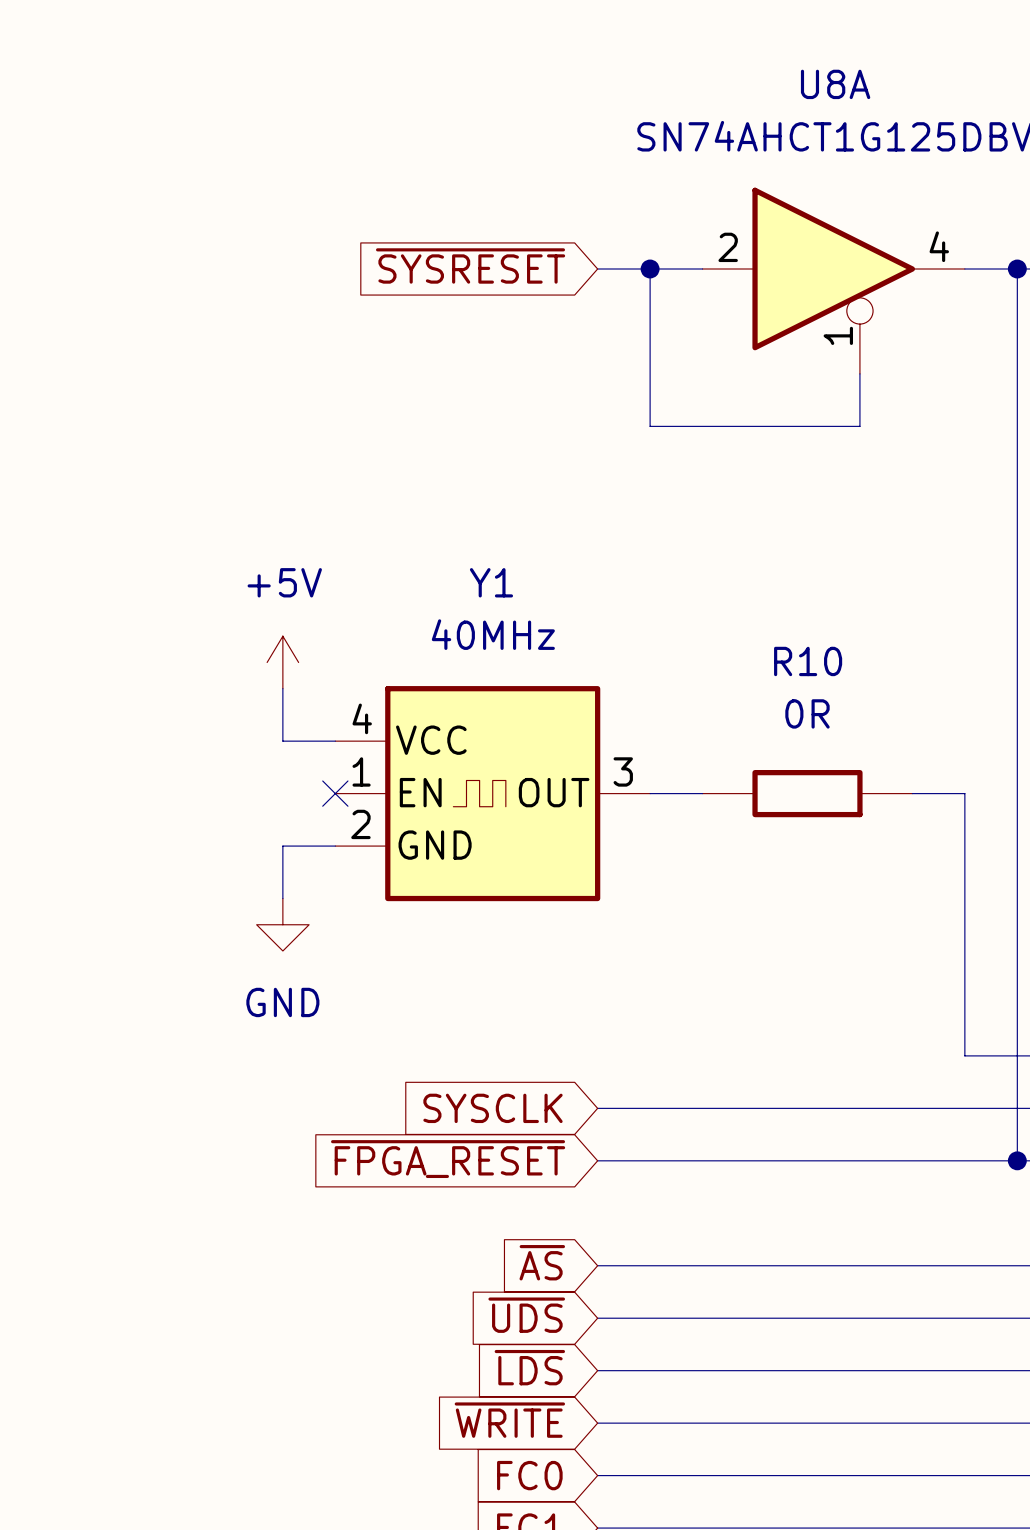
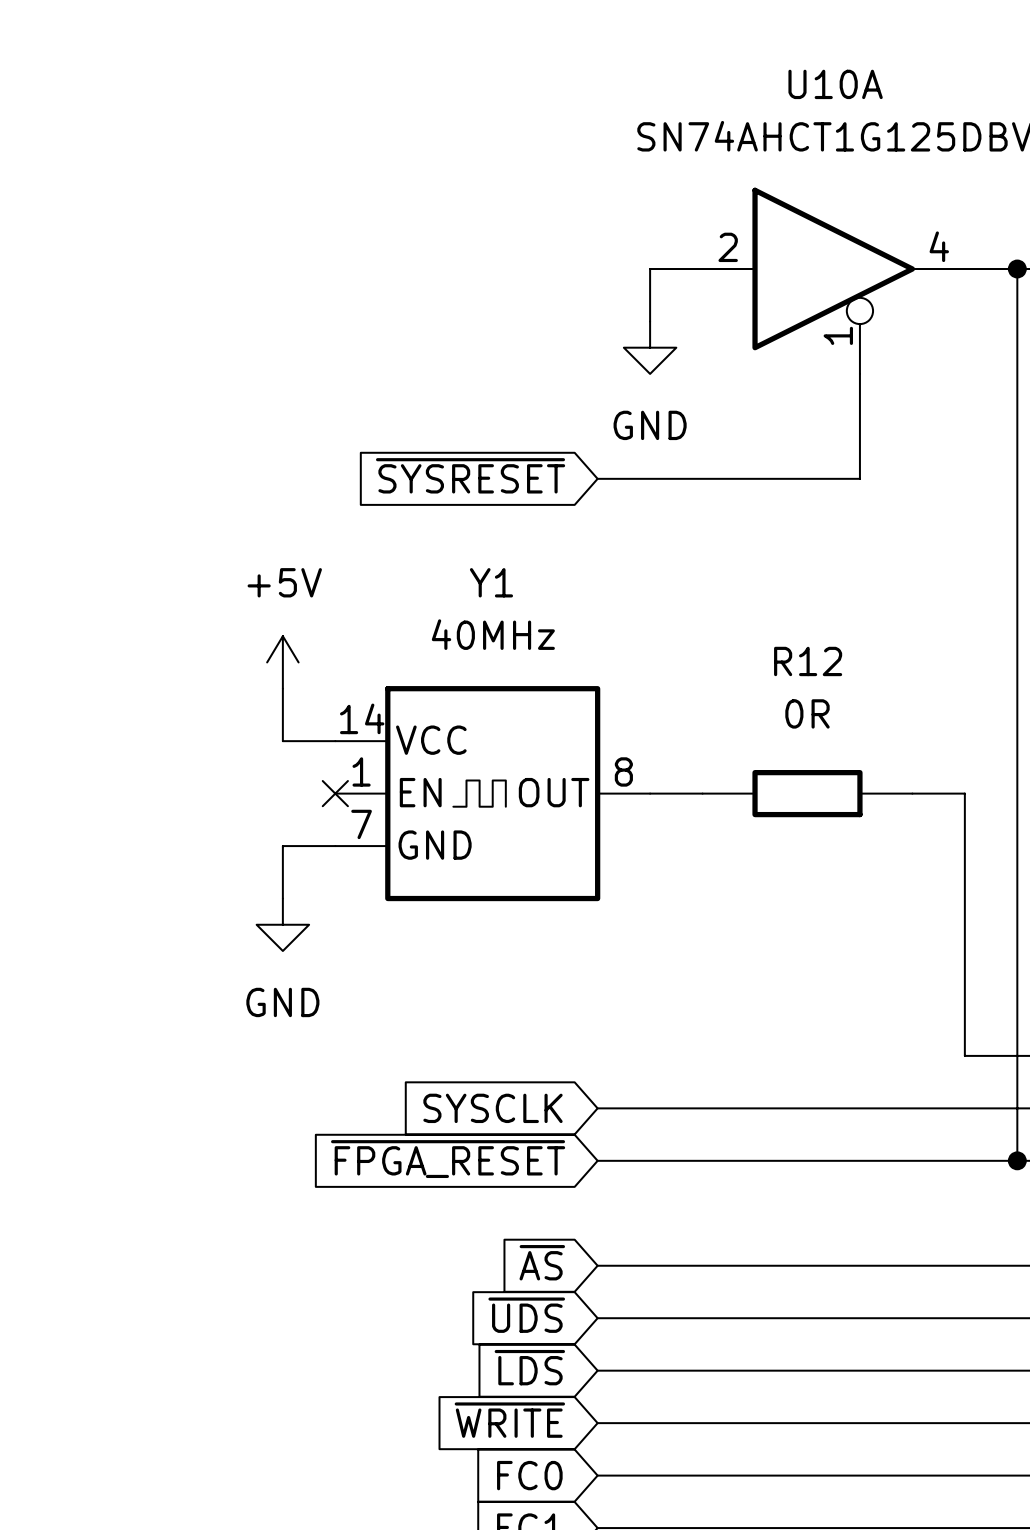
U8A name: U8A (835, 84) -> U10A (835, 84)
global label position: ~{SYSRESET} (470, 265) -> ~{SYSRESET} (470, 475)
wire: (597, 269) (650, 269) -> none
junction: (650, 269) -> none
wire: (650, 321) (650, 426) (859, 426) -> (597, 478) (859, 478) (859, 426)
power symbol: none -> GND (650, 347)
R10 name: R10 (808, 661) -> R12 (808, 661)
Y1 pin number: 4 (362, 718) -> 14 (362, 718)
Y1 pin number: 3 (623, 771) -> 8 (623, 771)
Y1 pin number: 2 (360, 824) -> 7 (361, 824)

